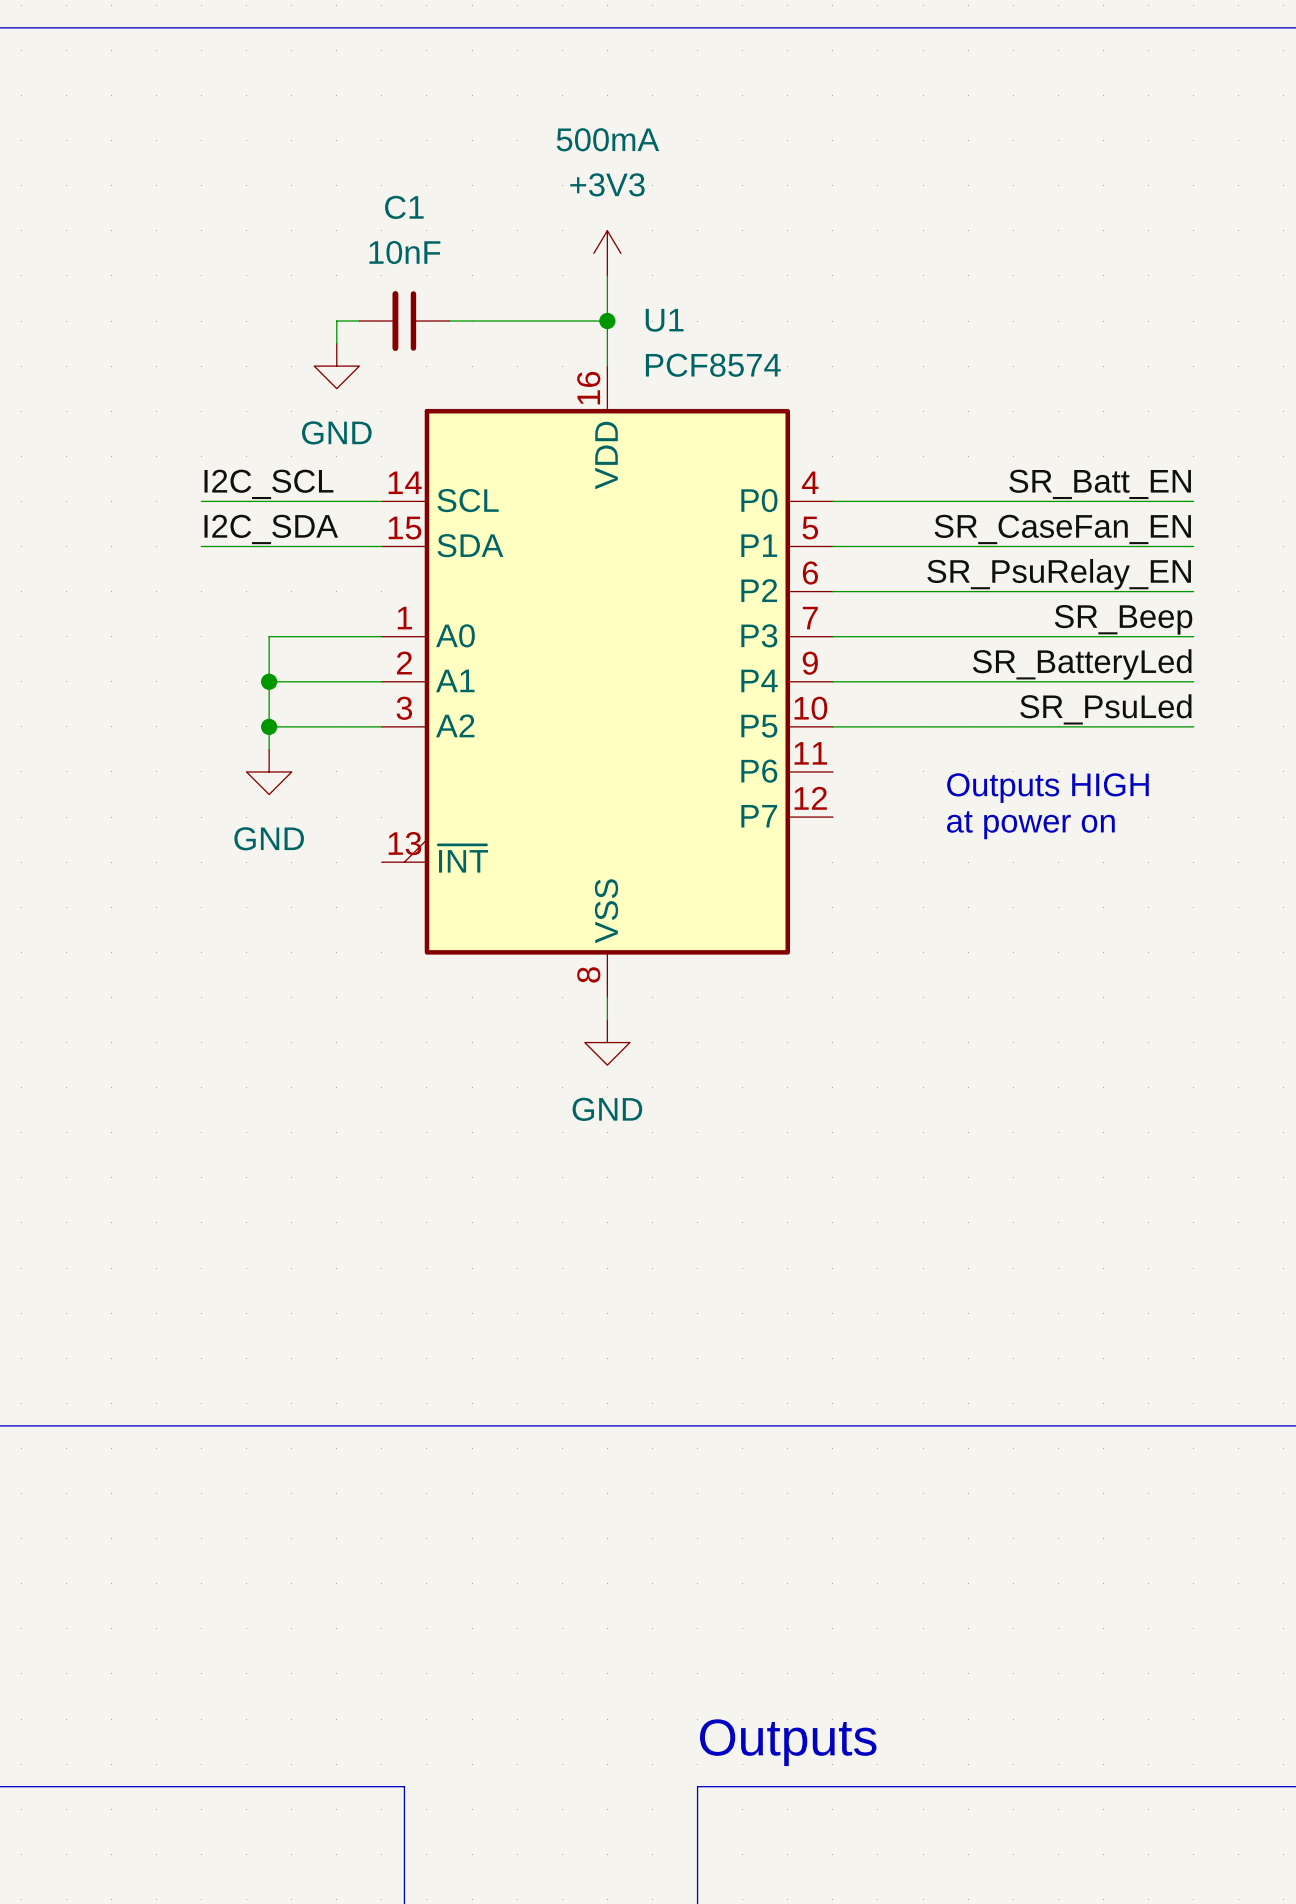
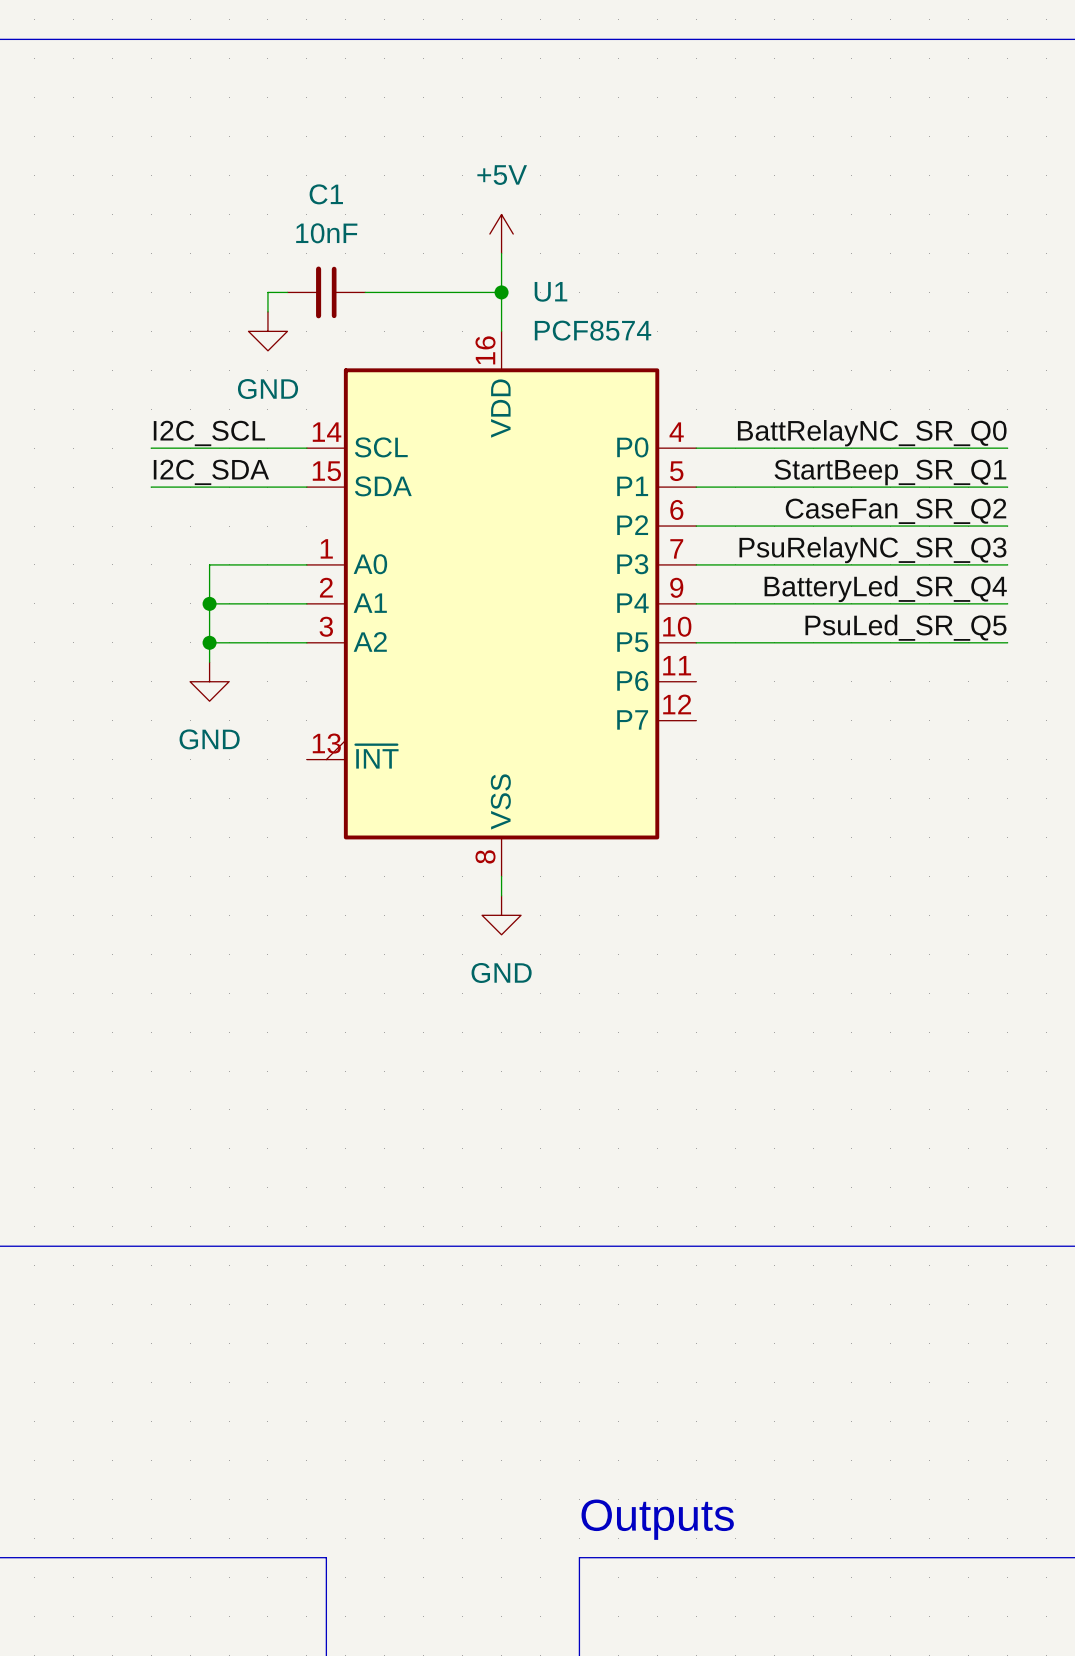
power symbol: +3V3 (607, 253) -> +5V (501, 234)
label: SR_Batt_EN (1100, 484) -> BattRelayNC_SR_Q0 (872, 433)
label: SR_CaseFan_EN (1062, 529) -> StartBeep_SR_Q1 (890, 472)
label: SR_PsuRelay_EN (1059, 574) -> CaseFan_SR_Q2 (896, 511)
label: SR_Beep (1123, 619) -> PsuRelayNC_SR_Q3 (872, 549)
label: SR_BatteryLed (1082, 664) -> BatteryLed_SR_Q4 (885, 588)
label: SR_PsuLed (1105, 709) -> PsuLed_SR_Q5 (905, 627)
text: Outputs HIGH (1047, 788) -> none
text: at power on (1030, 825) -> none

